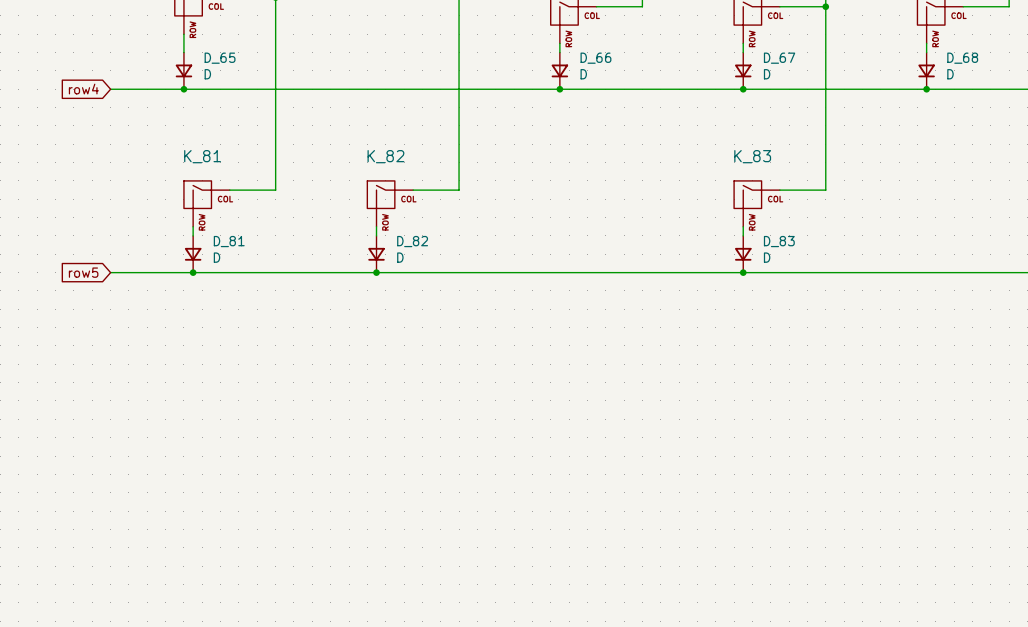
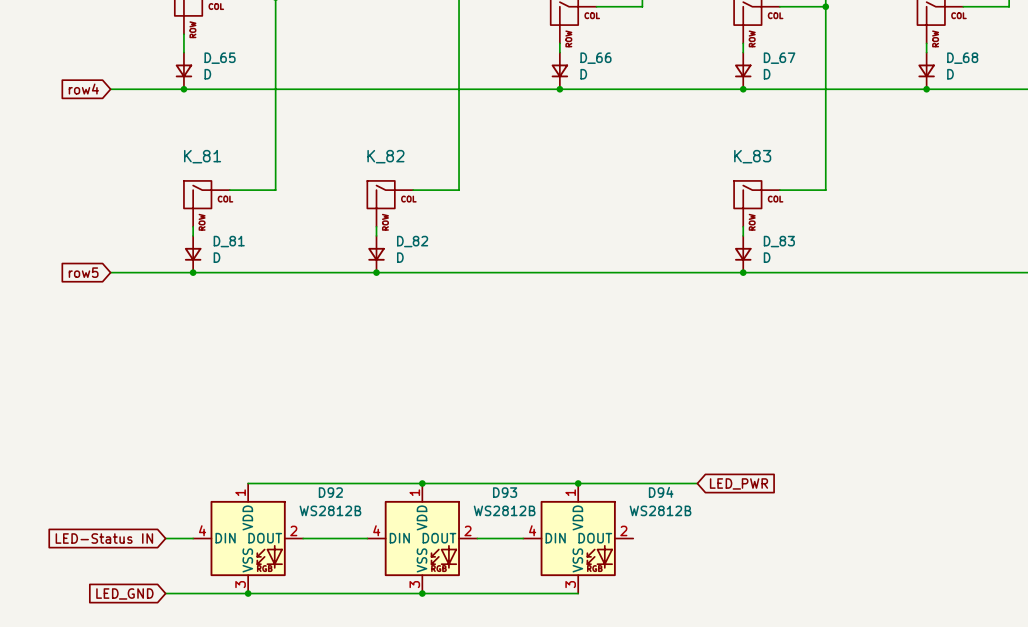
wire: none -> (248, 483) (697, 483)
junction: none -> (422, 483)
junction: none -> (578, 483)
global label: none -> LED_PWR (739, 483)
global label: none -> LED-Status IN (104, 538)
wire: none -> (165, 538) (193, 538)
D92: none -> WS2812B (248, 538)
wire: none -> (303, 538) (367, 538)
D93: none -> WS2812B (422, 538)
wire: none -> (477, 538) (523, 538)
D94: none -> WS2812B (578, 538)
global label: none -> LED_GND (124, 593)
wire: none -> (165, 593) (578, 593)
junction: none -> (248, 593)
junction: none -> (422, 593)

